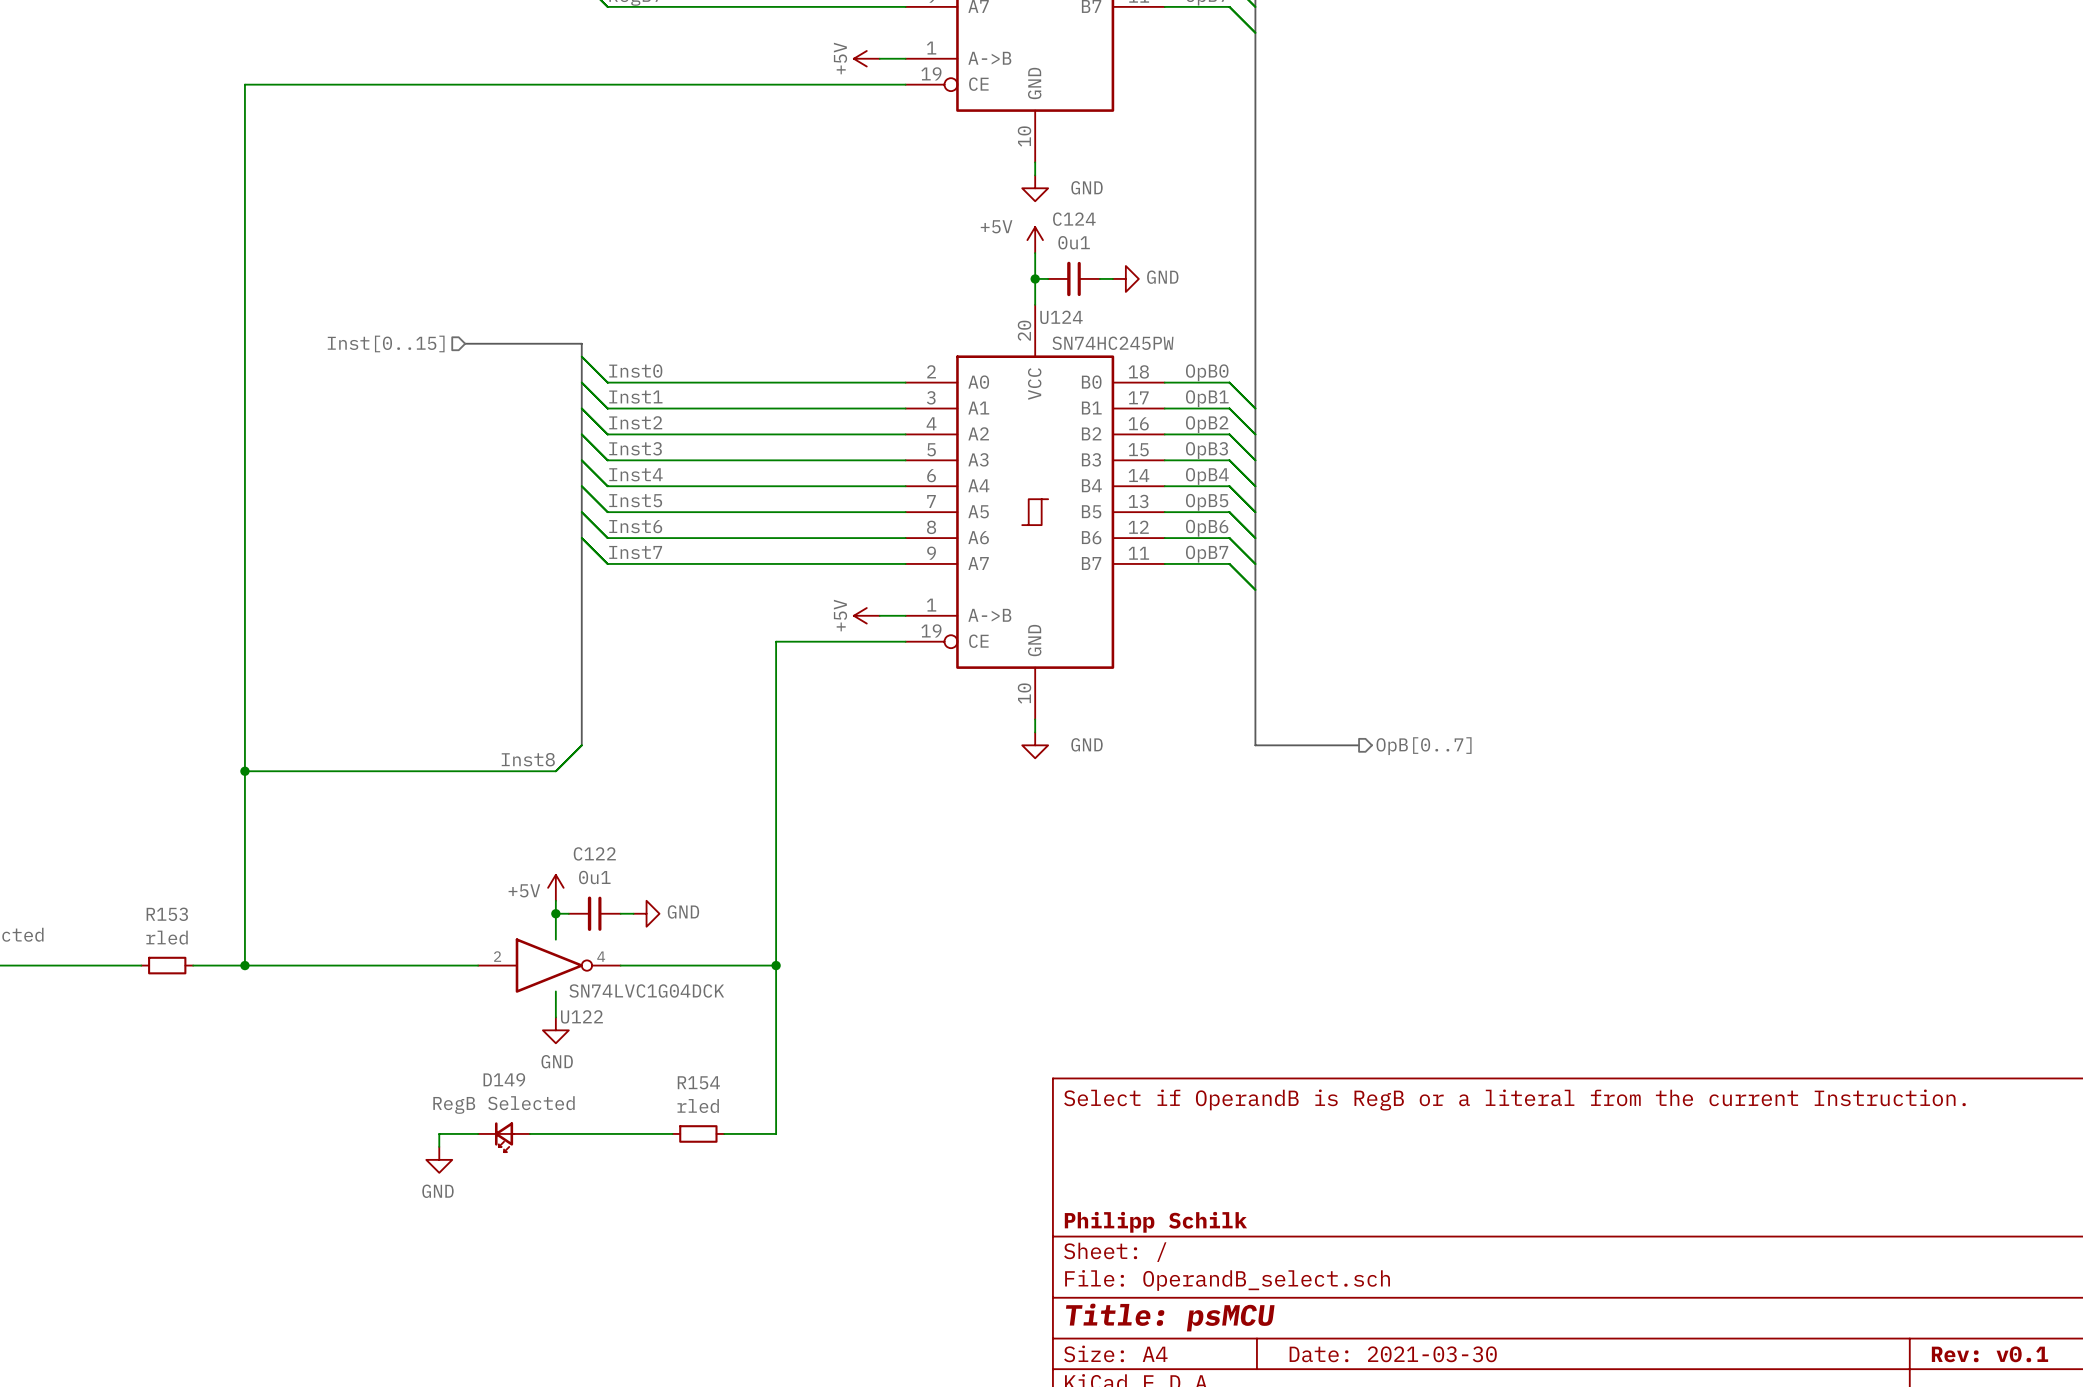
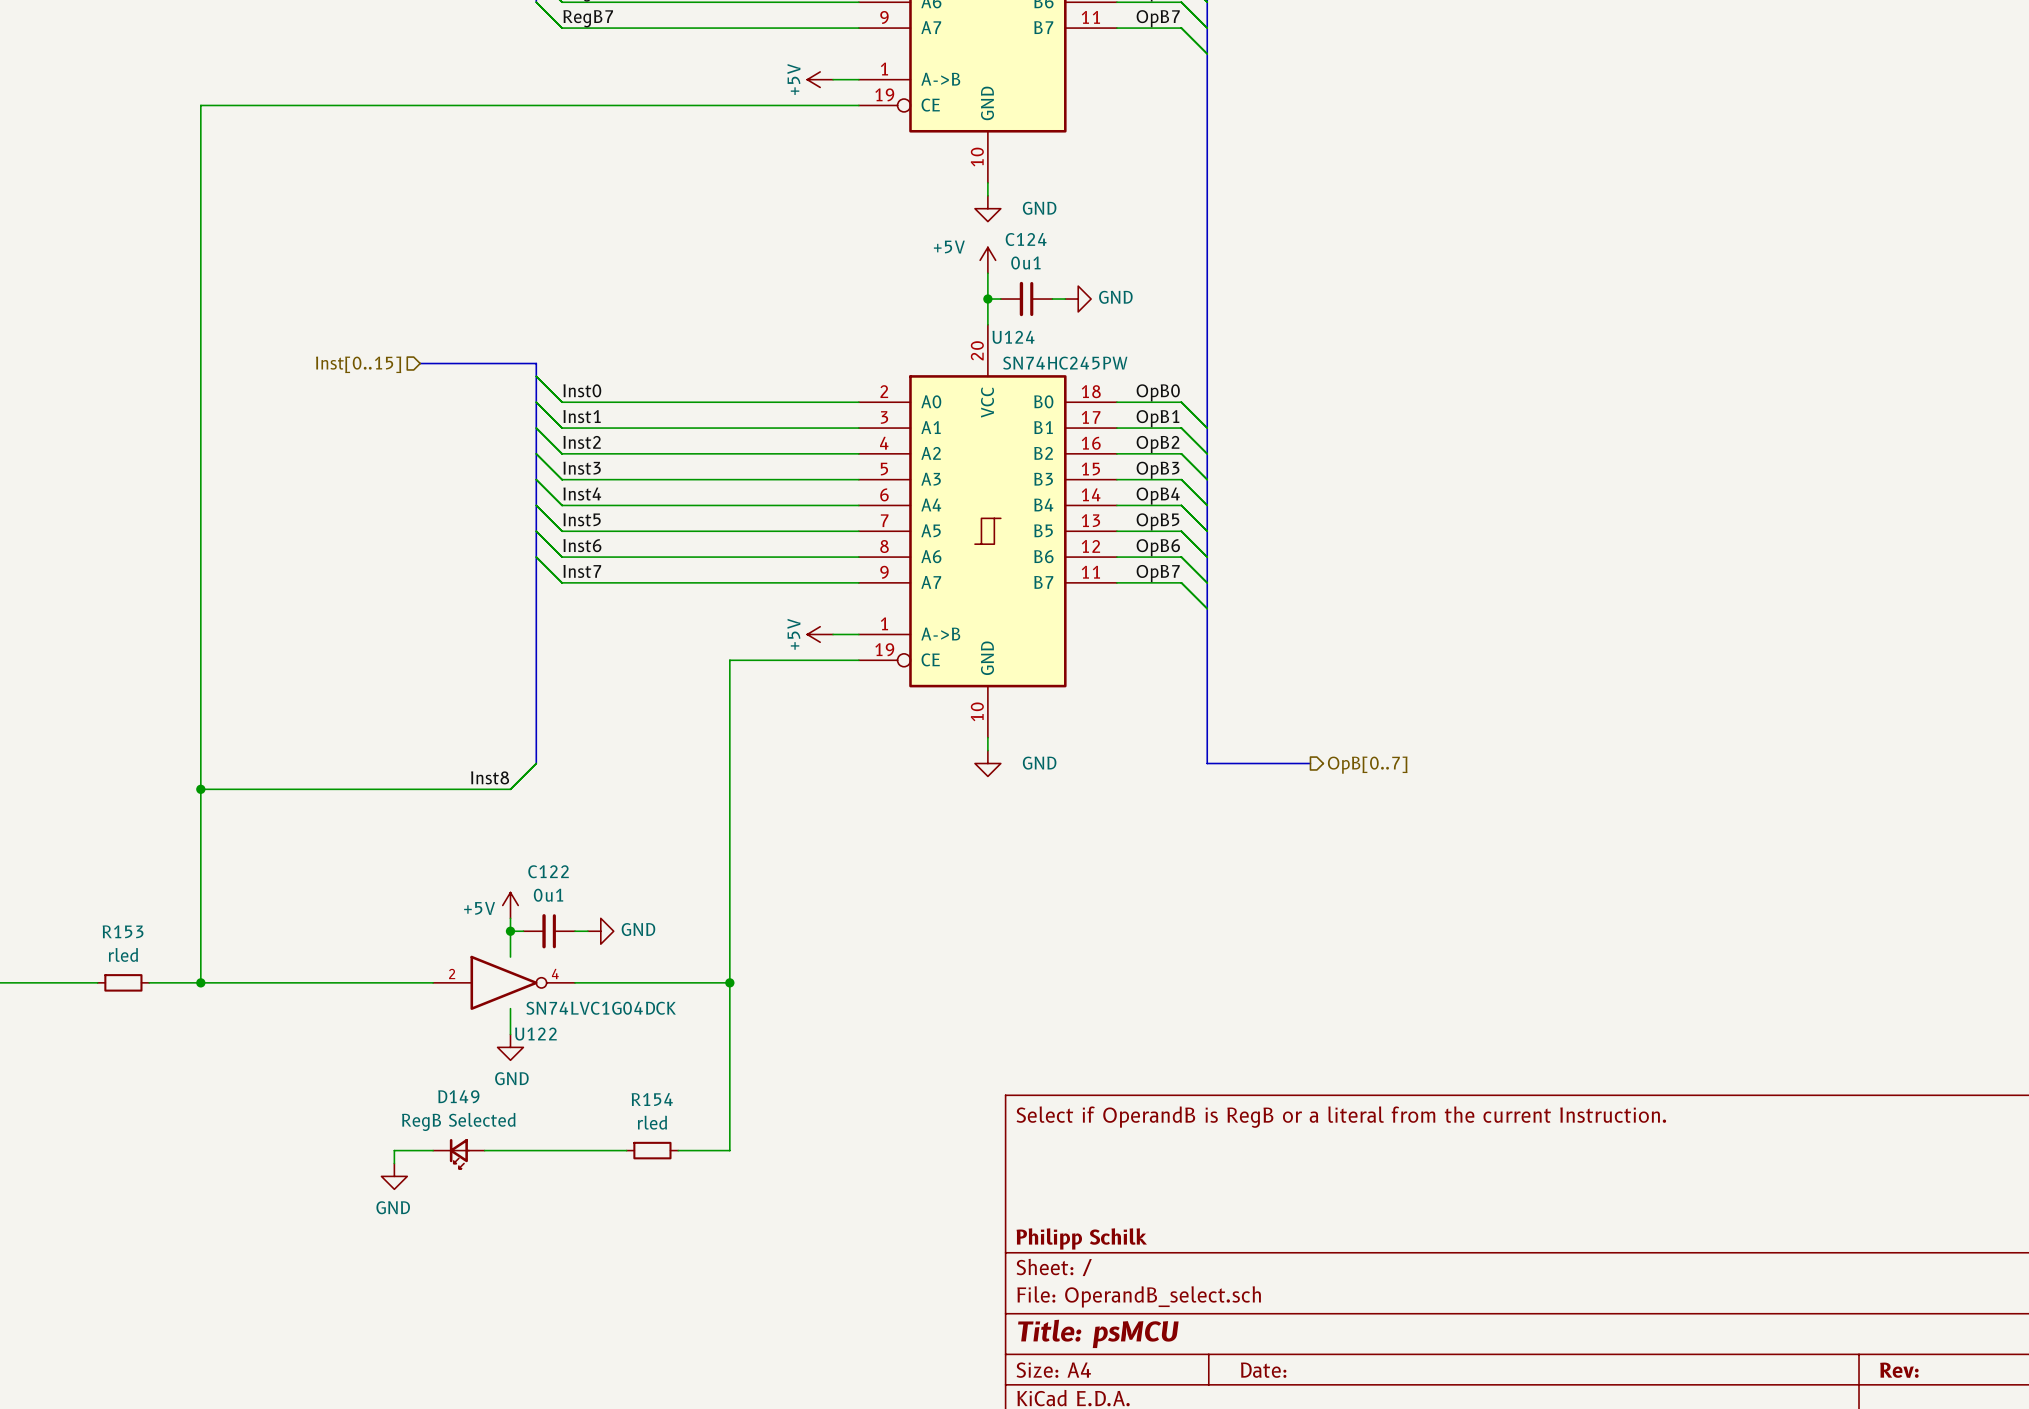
title block: Date: 2021-03-30 (1393, 1354) -> Date: (1263, 1370)
title block: Rev: v0.1 (1989, 1354) -> Rev: (1899, 1370)

